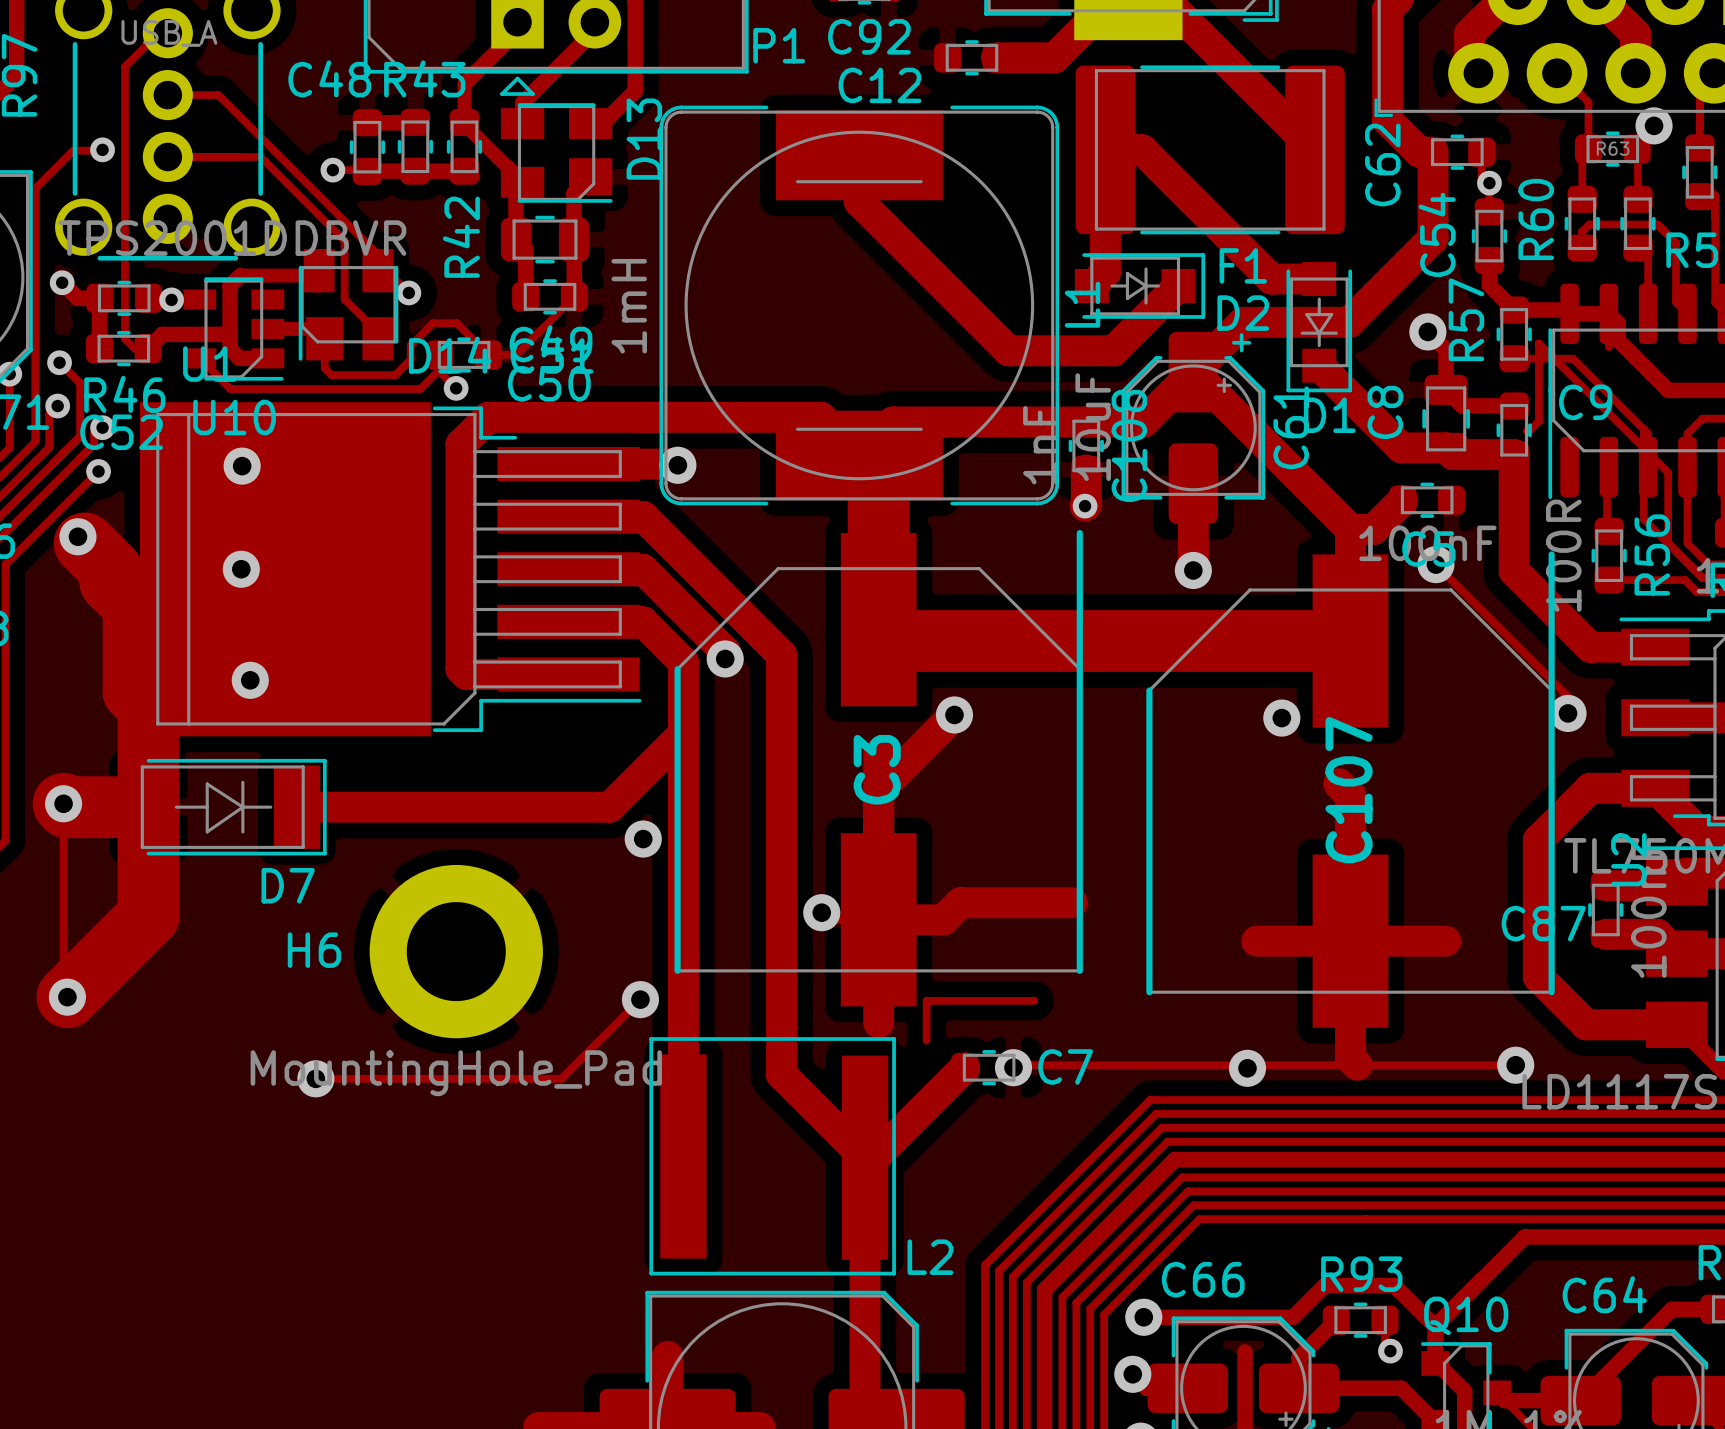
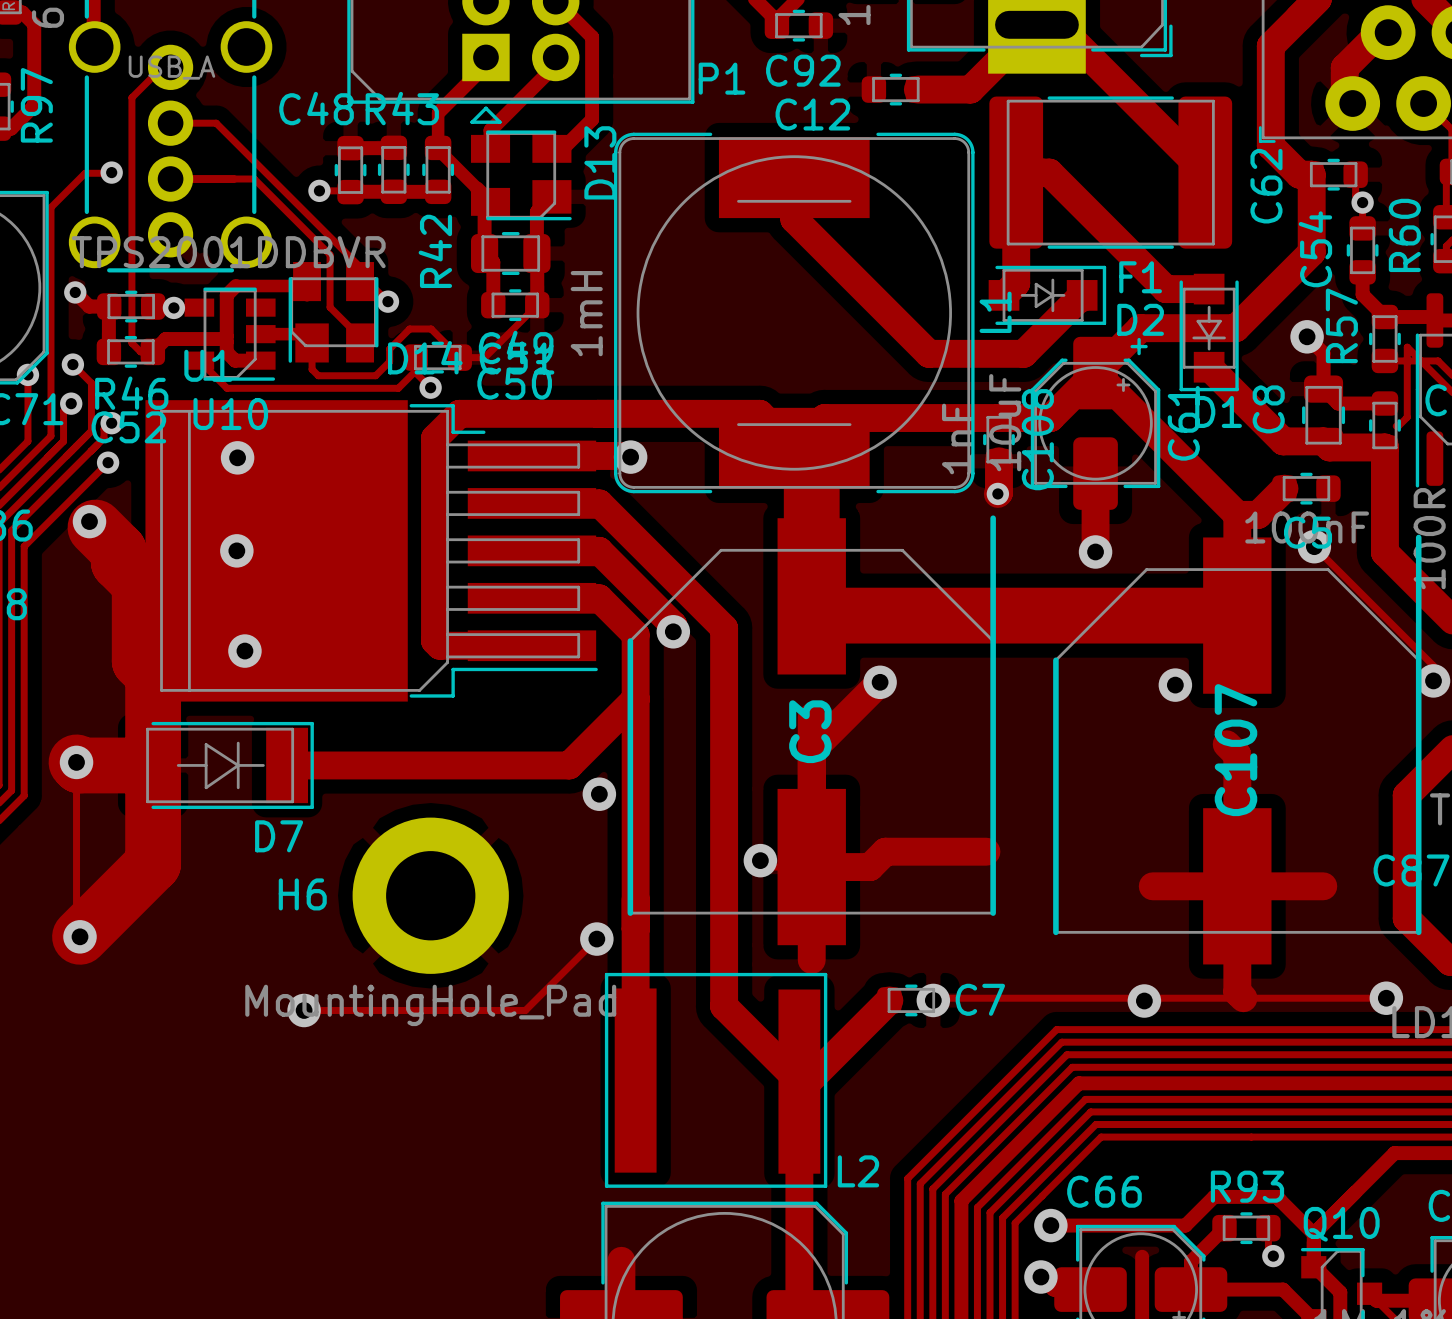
track: (1034, 1000) (926, 1000) (926, 1040) -> none

